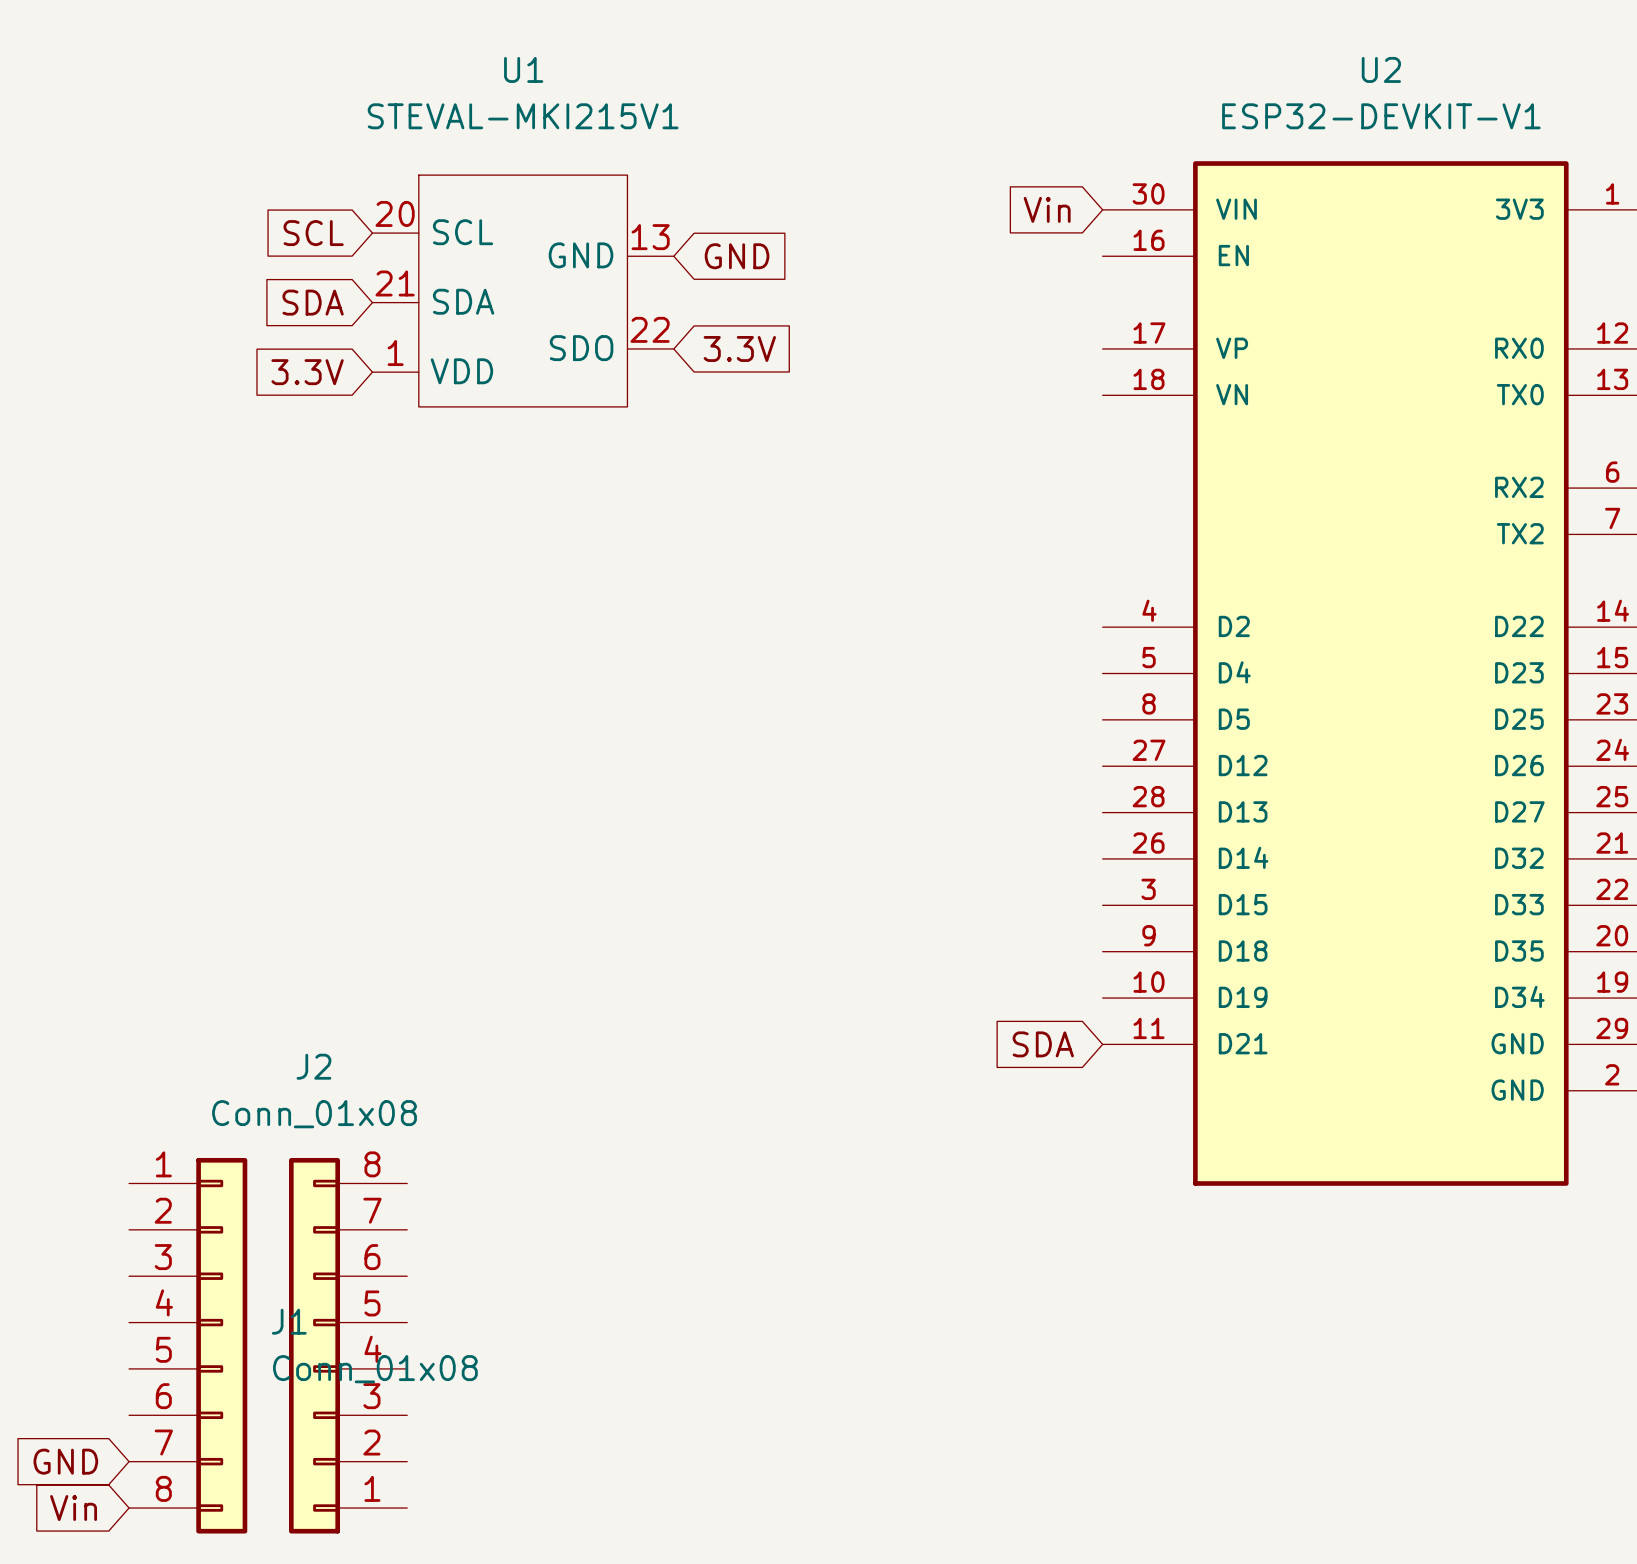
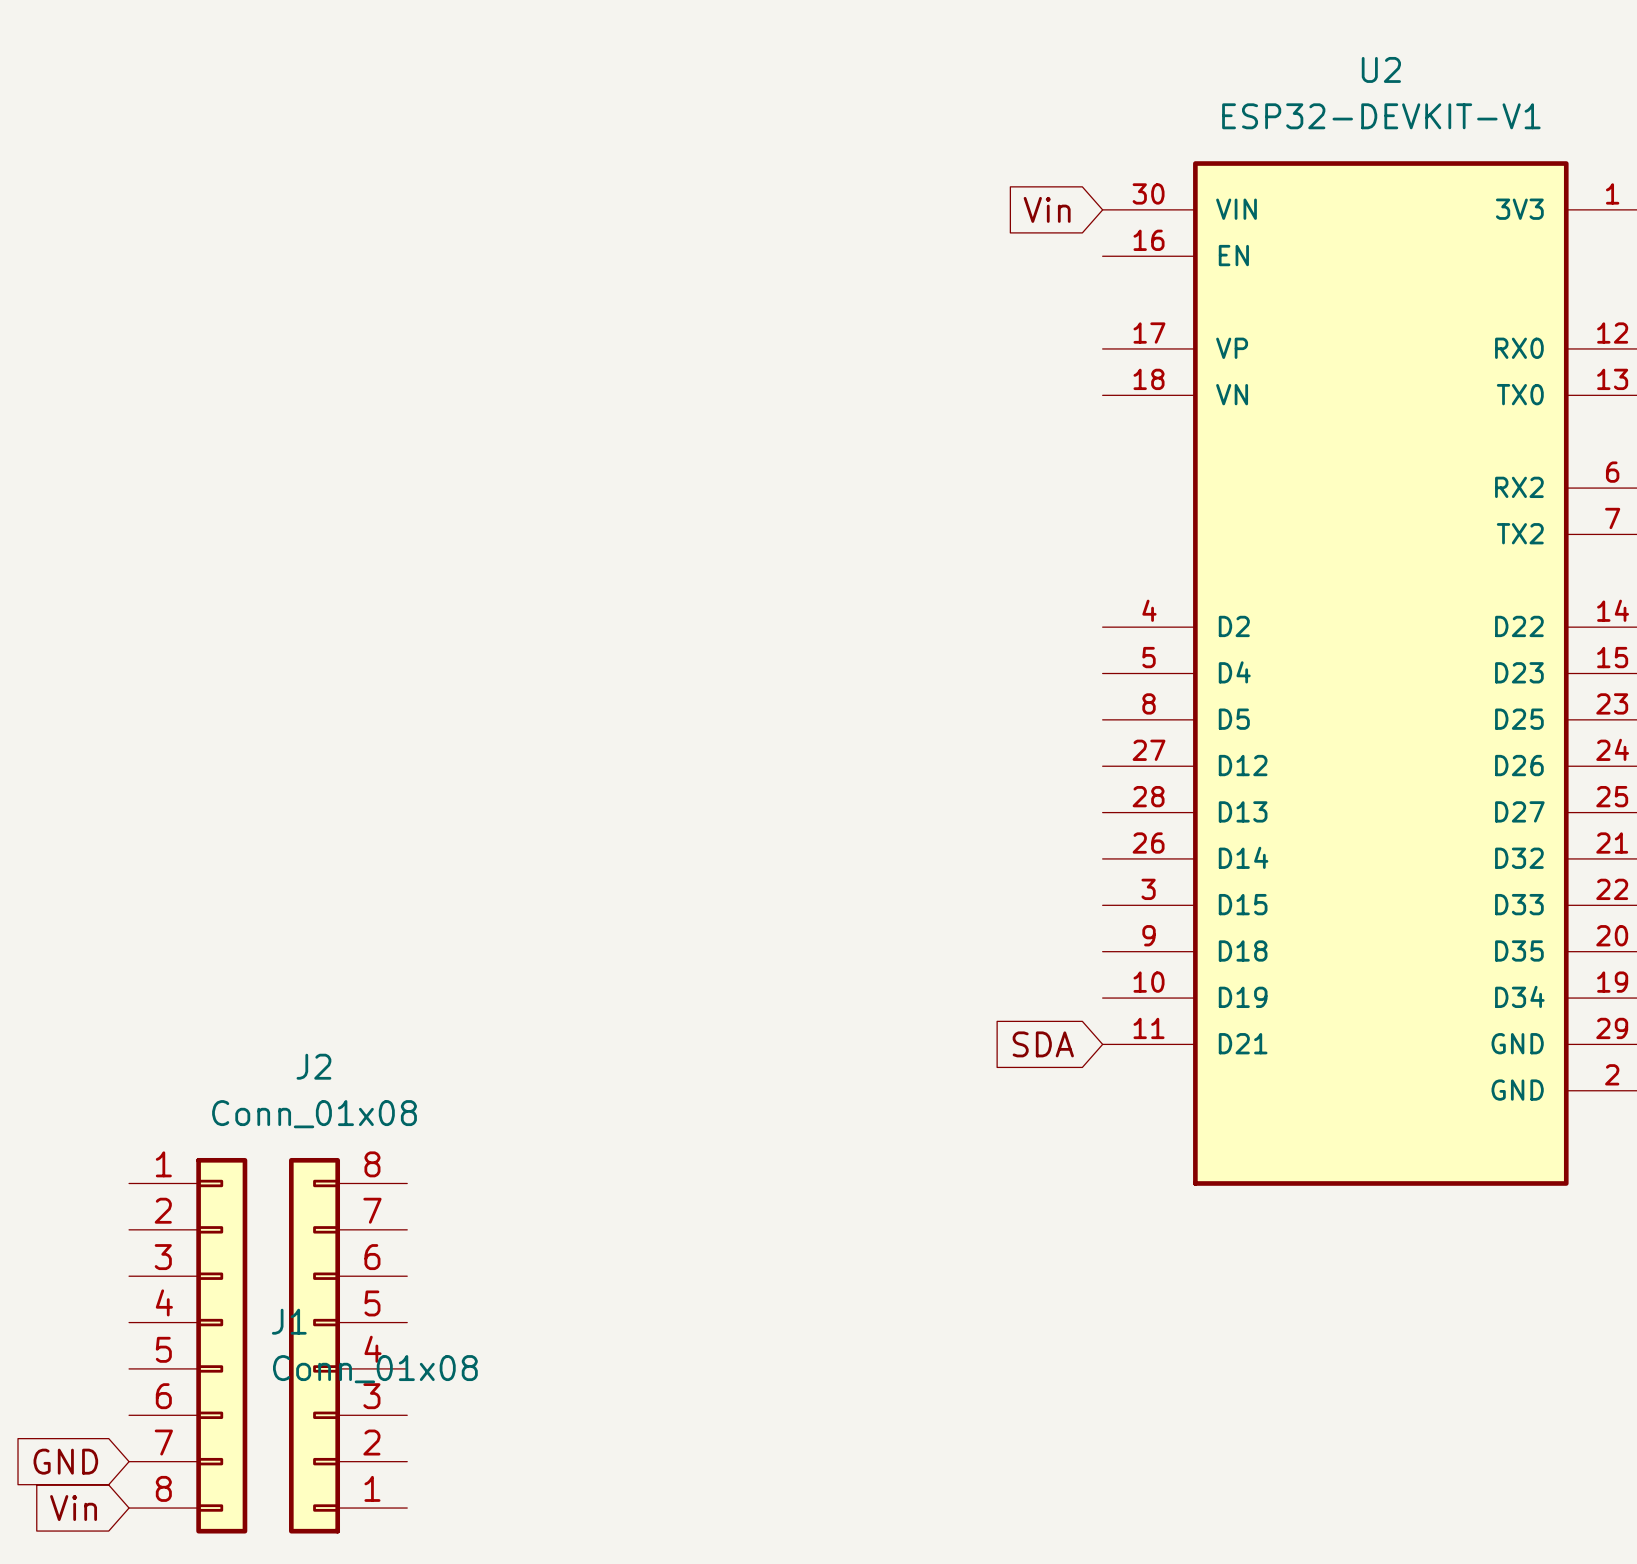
global label: SCL (313, 233) -> none
global label: GND (737, 256) -> none
U1: STEVAL-MKI215V1 (523, 291) -> none
global label: SDA (313, 302) -> none
global label: 3.3V (739, 348) -> none
global label: 3.3V (307, 372) -> none

